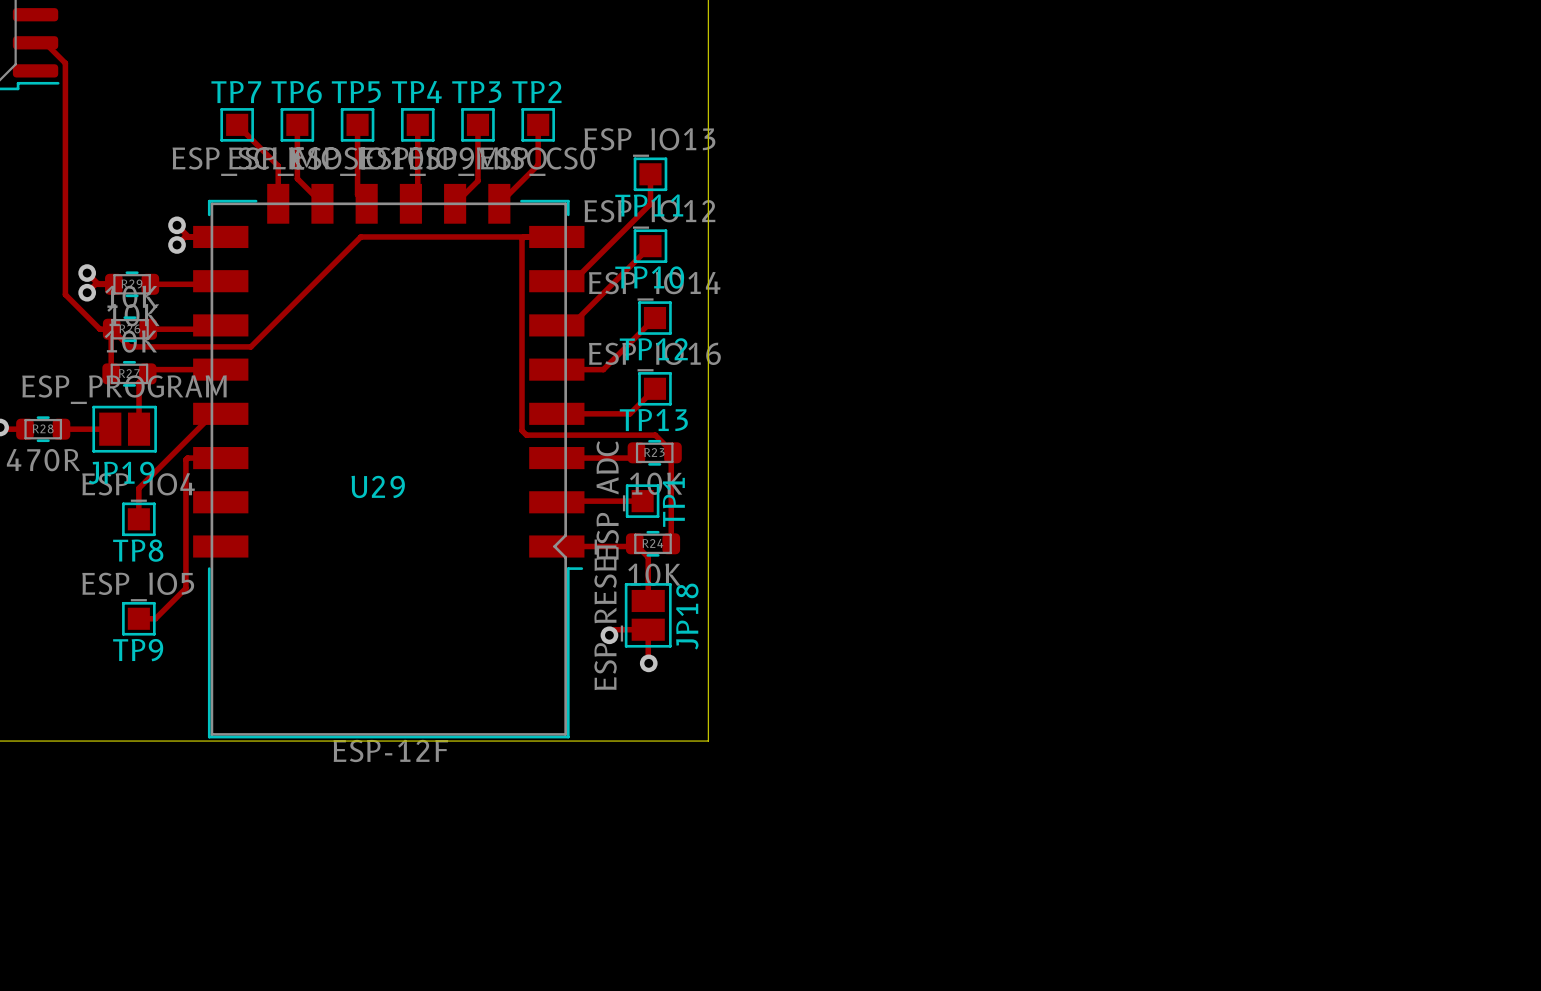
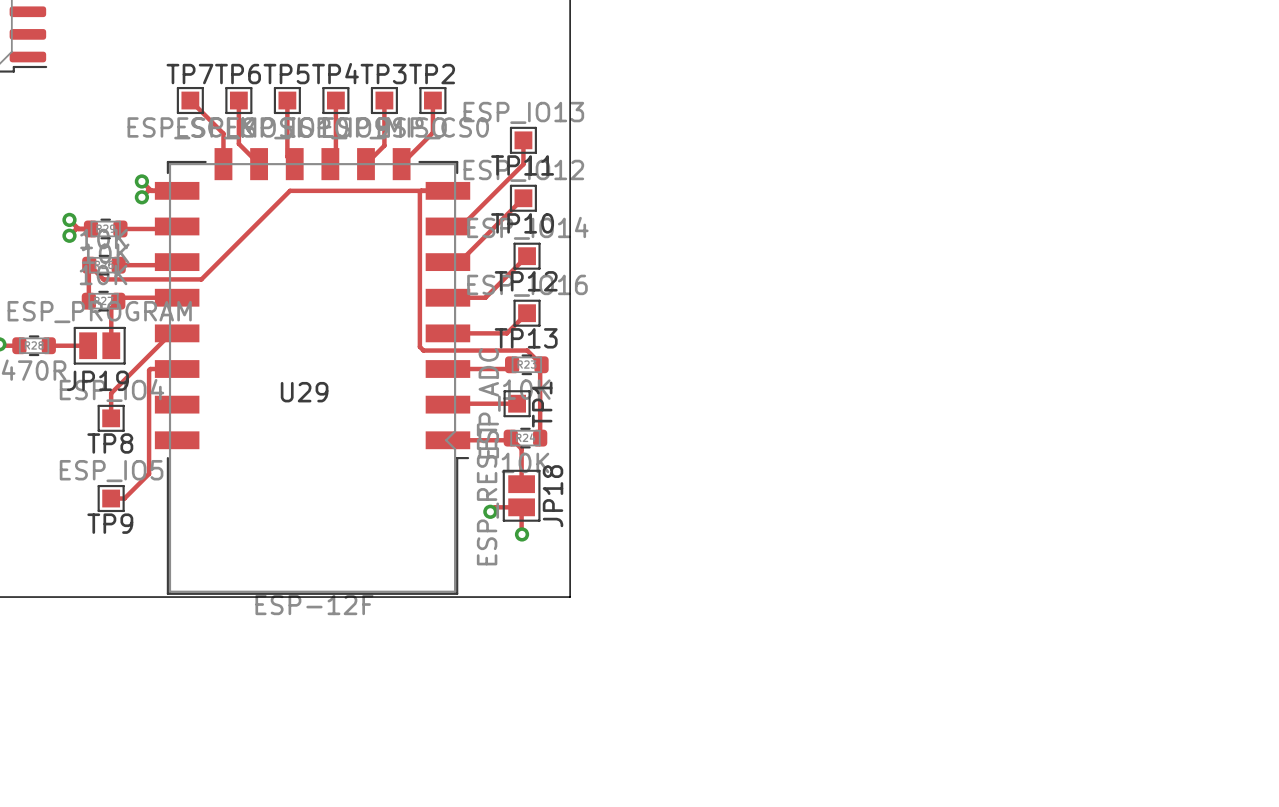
track: (35, 42) (44, 42) (65, 63) (65, 294) (99, 329) (111, 329) -> none

